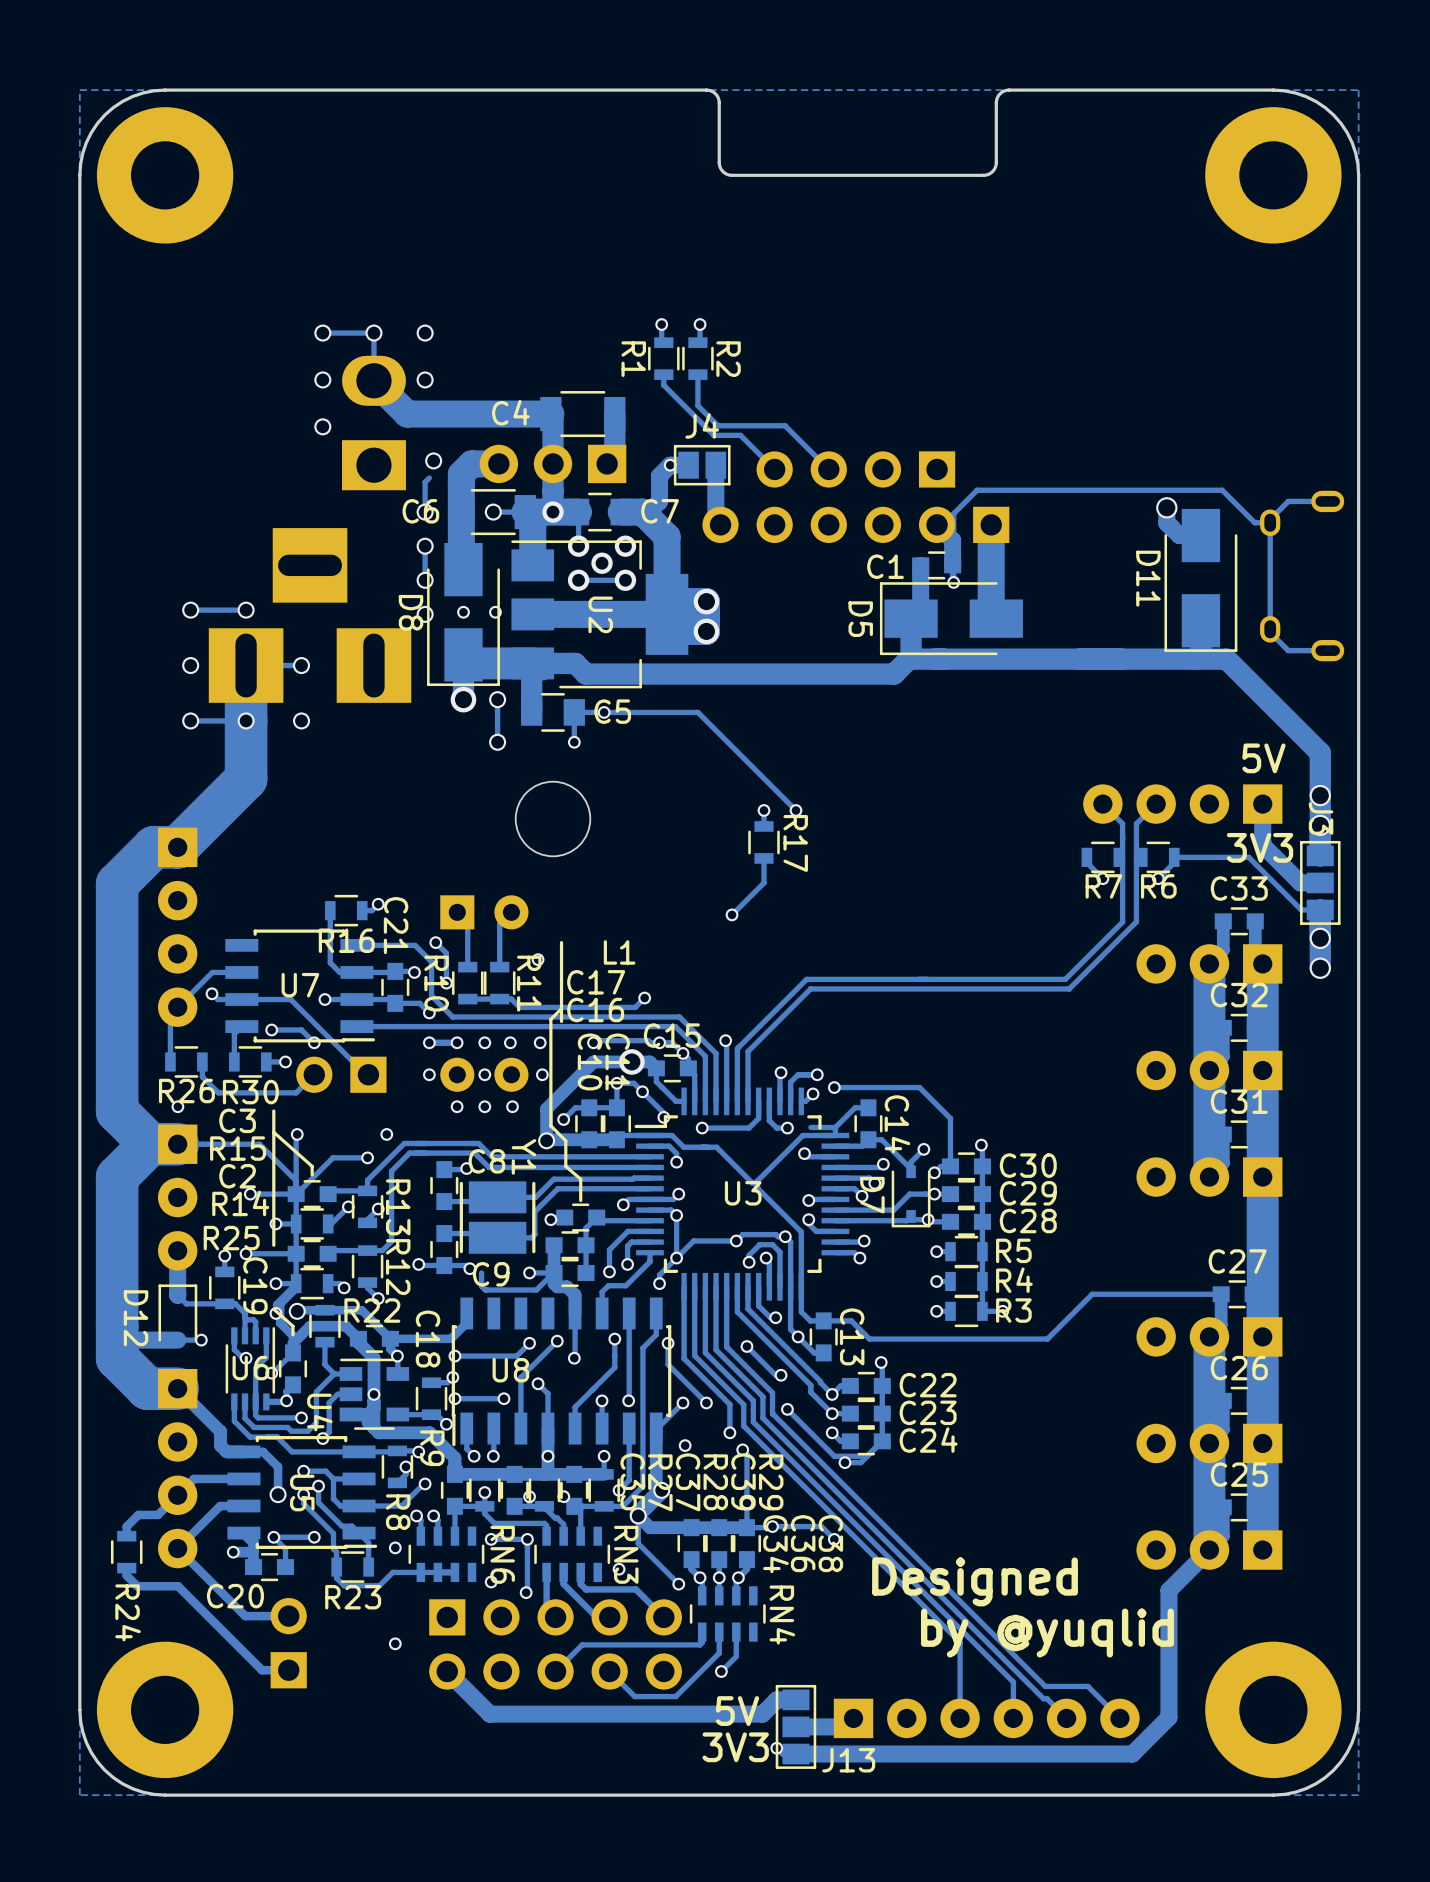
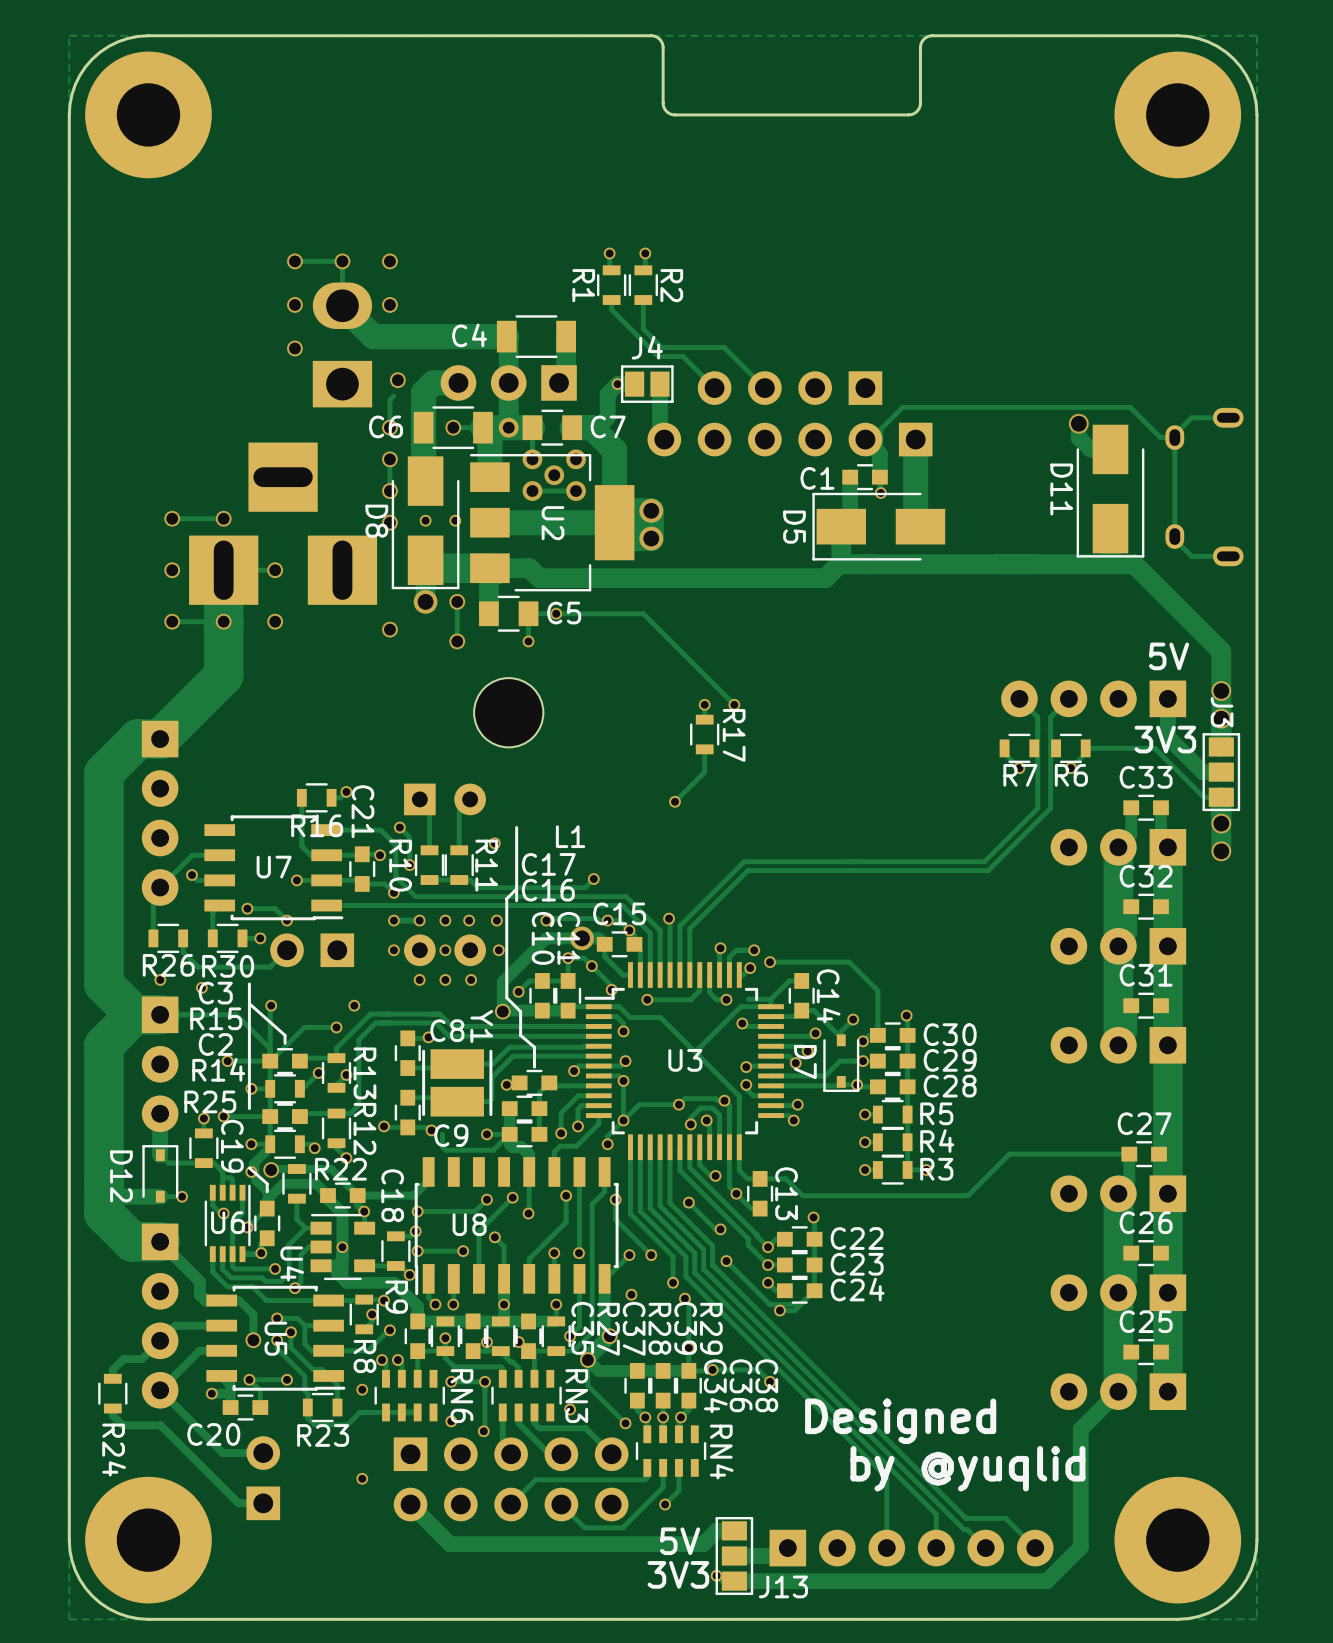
via: none -> (389, 629)
track: (241, 999) (290, 999) (365, 1074) (368, 1074) -> none
via: none -> (201, 987)

